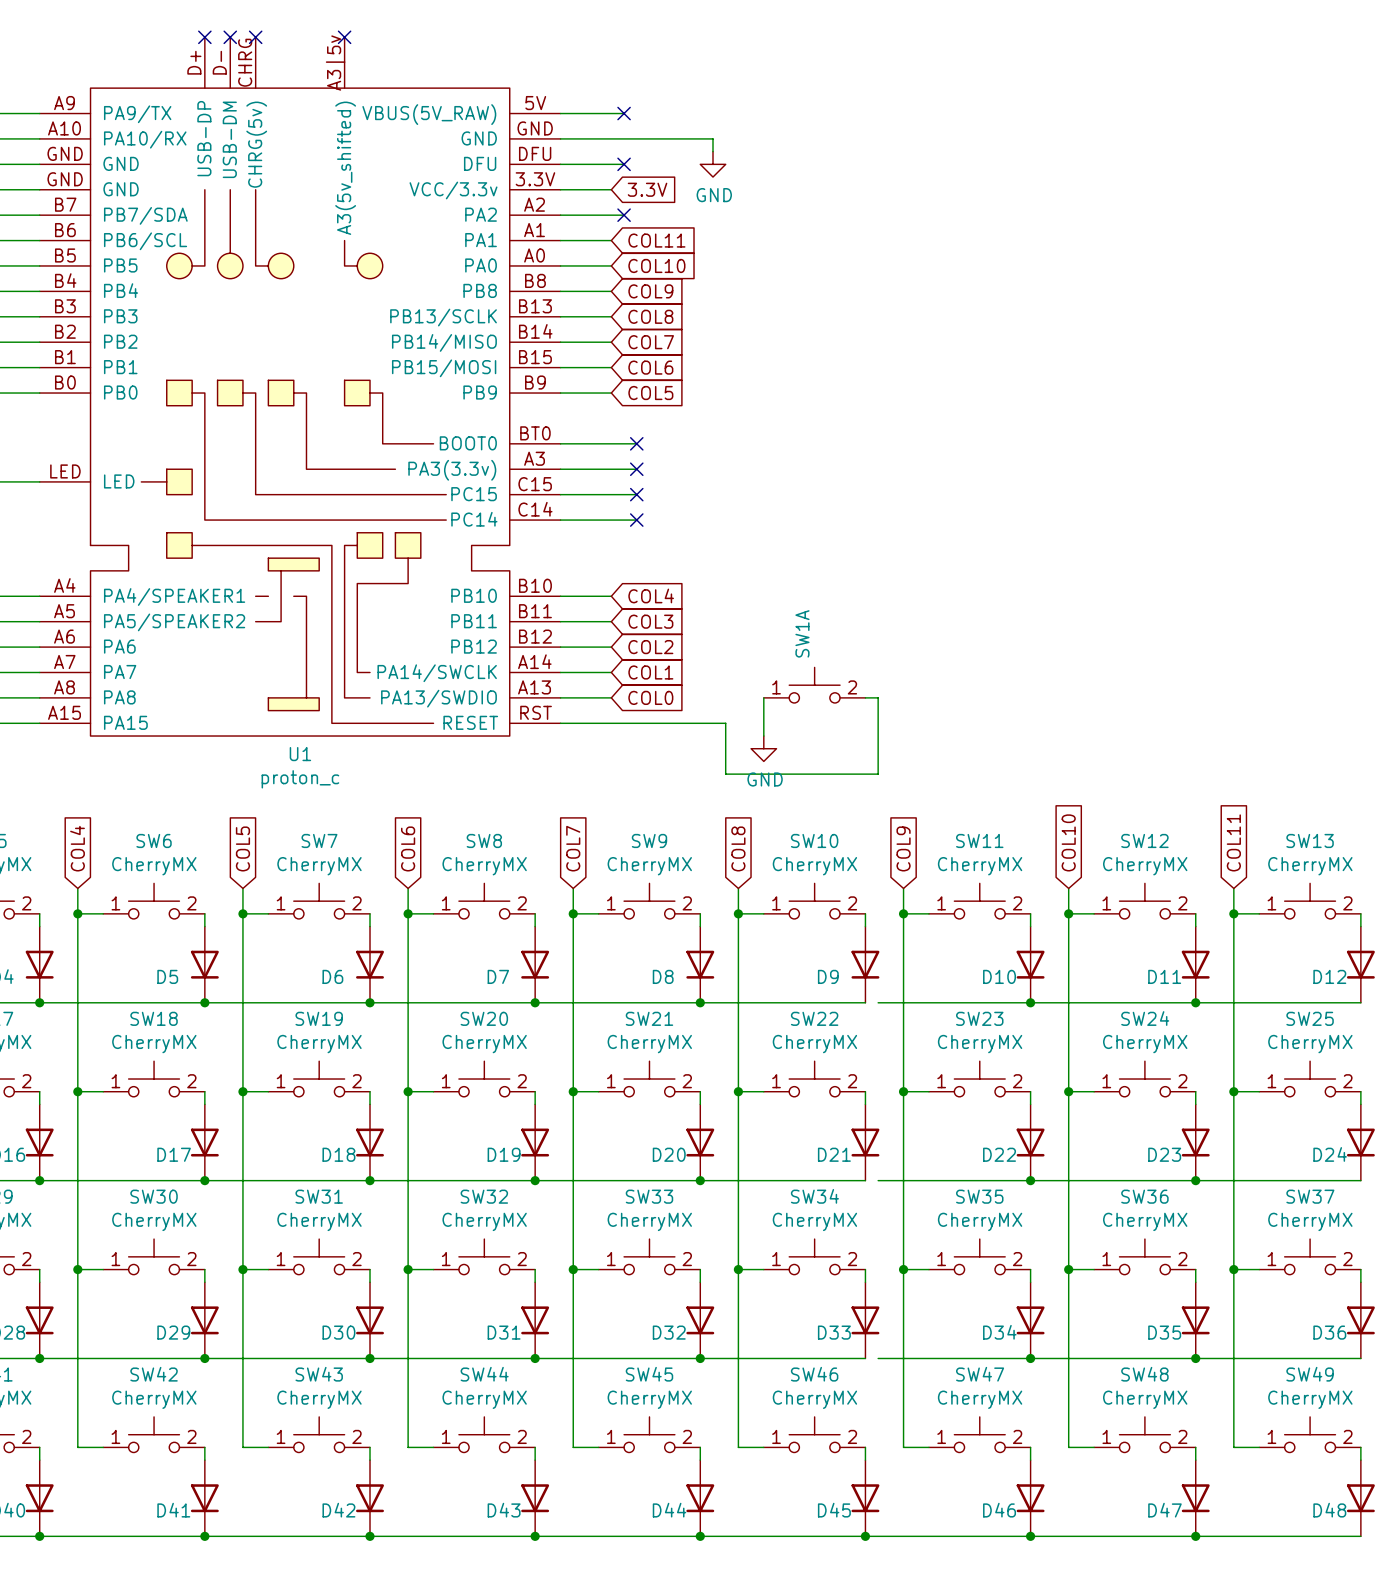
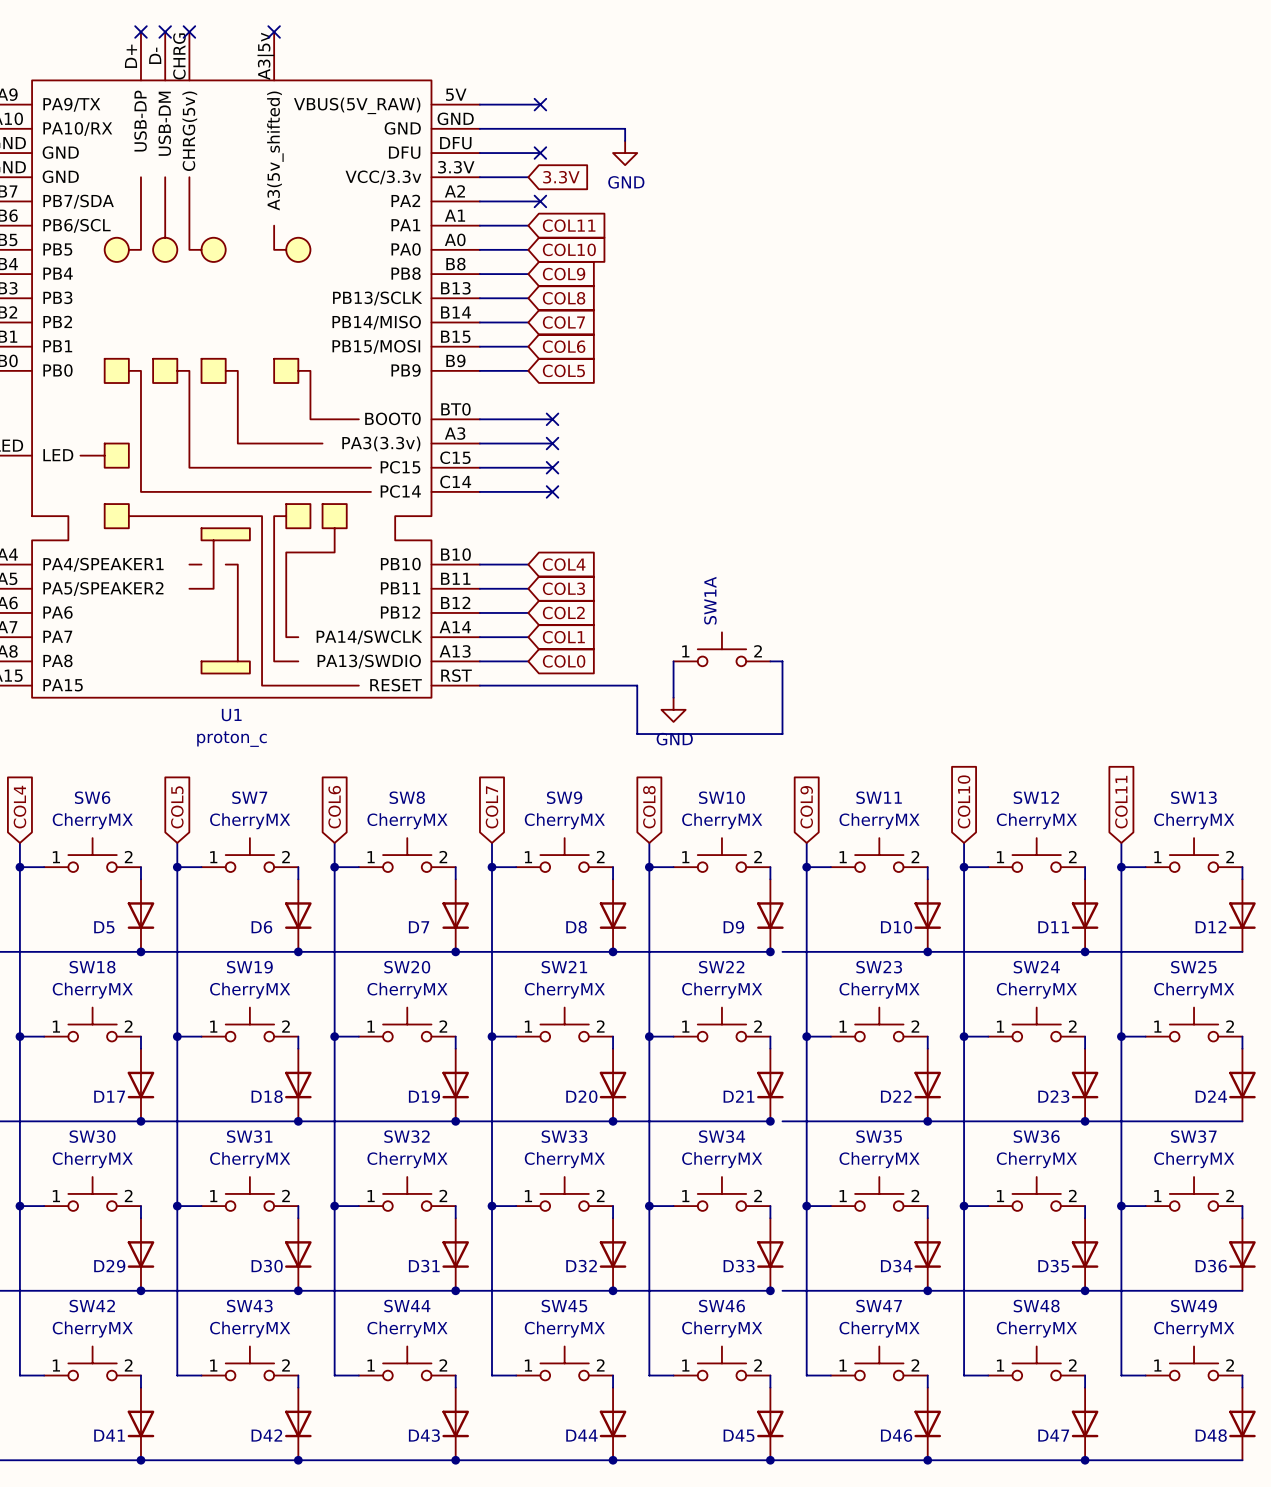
junction: none -> (770, 951)
junction: none -> (770, 1121)
junction: none -> (770, 1290)

